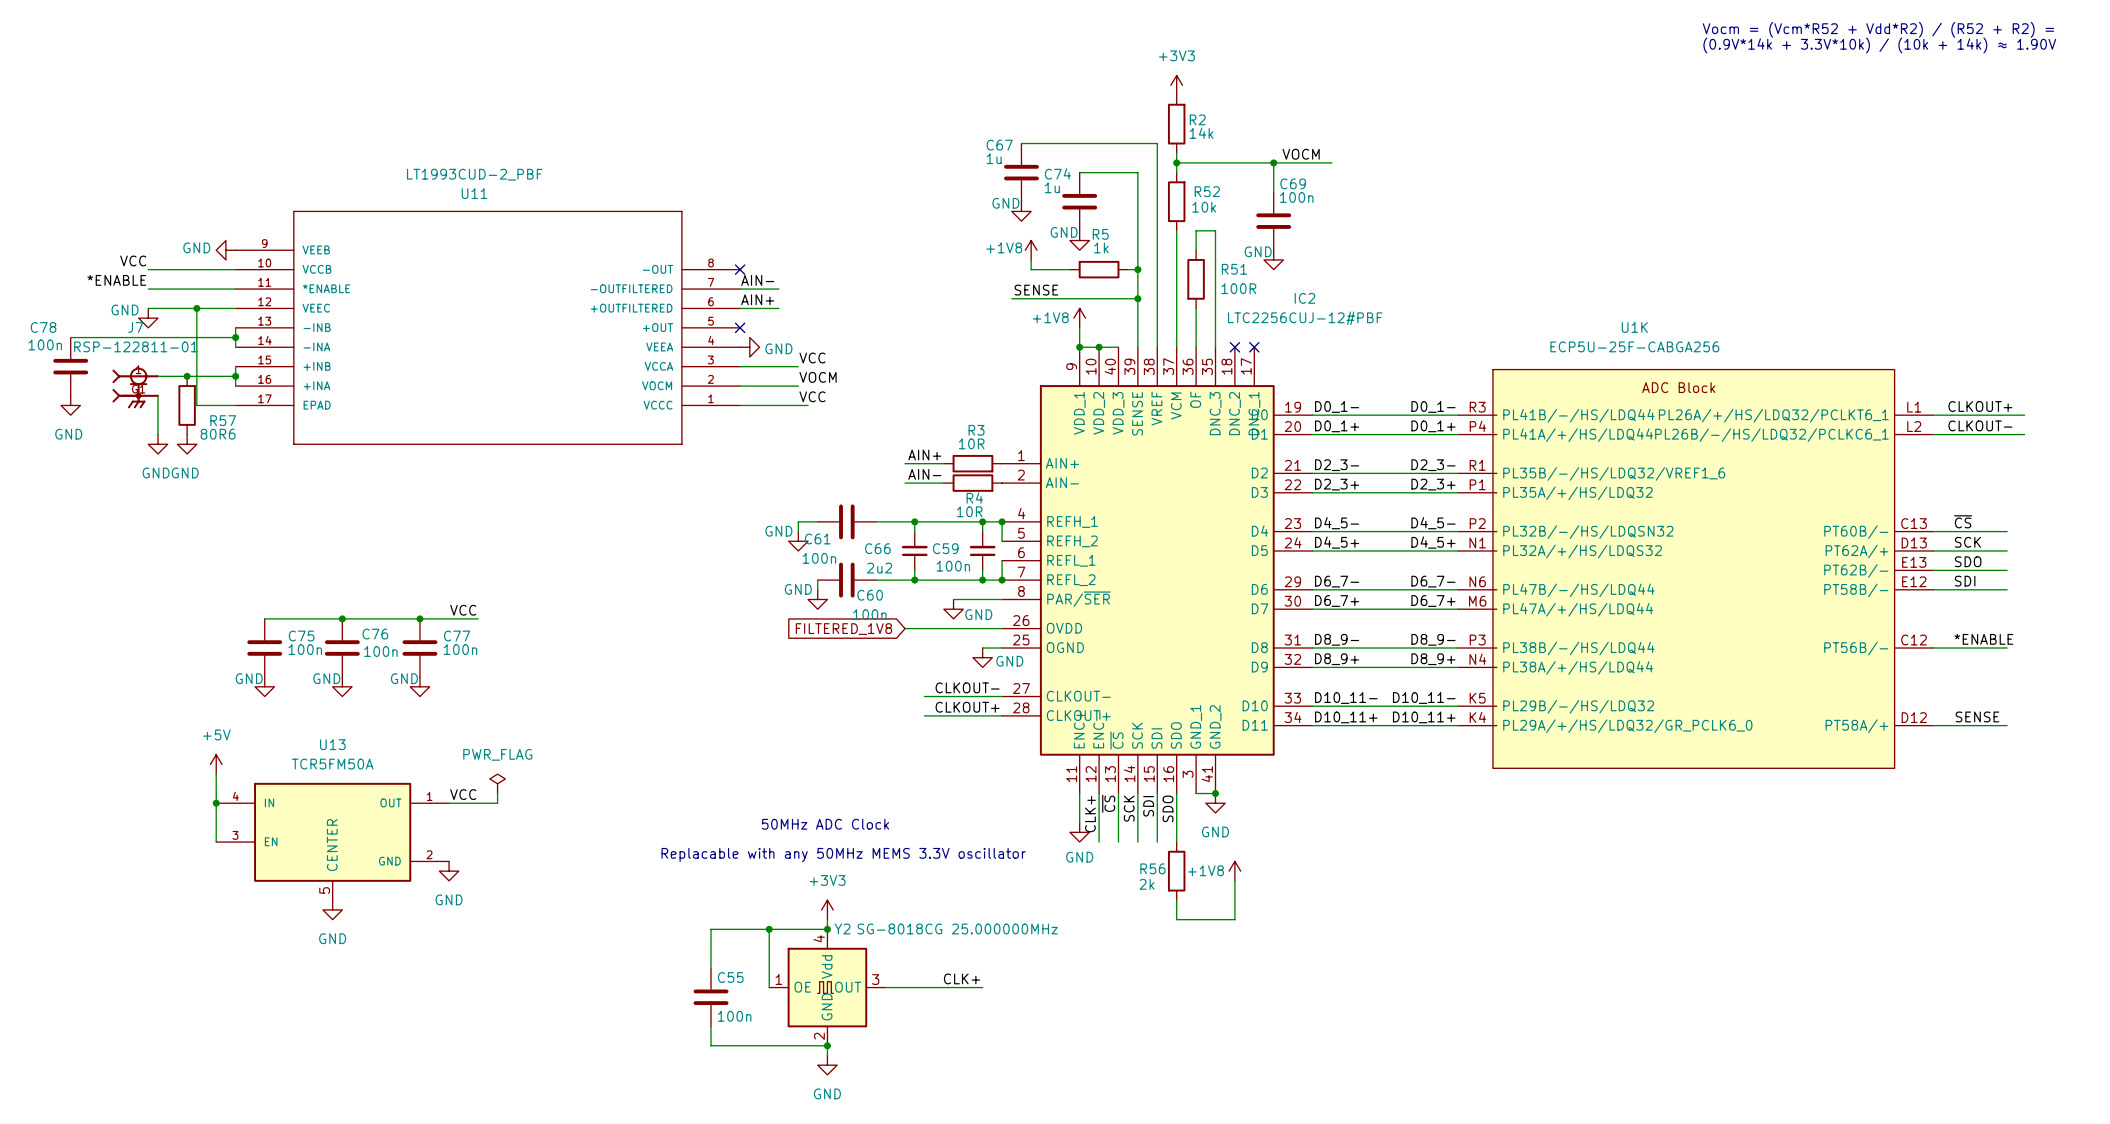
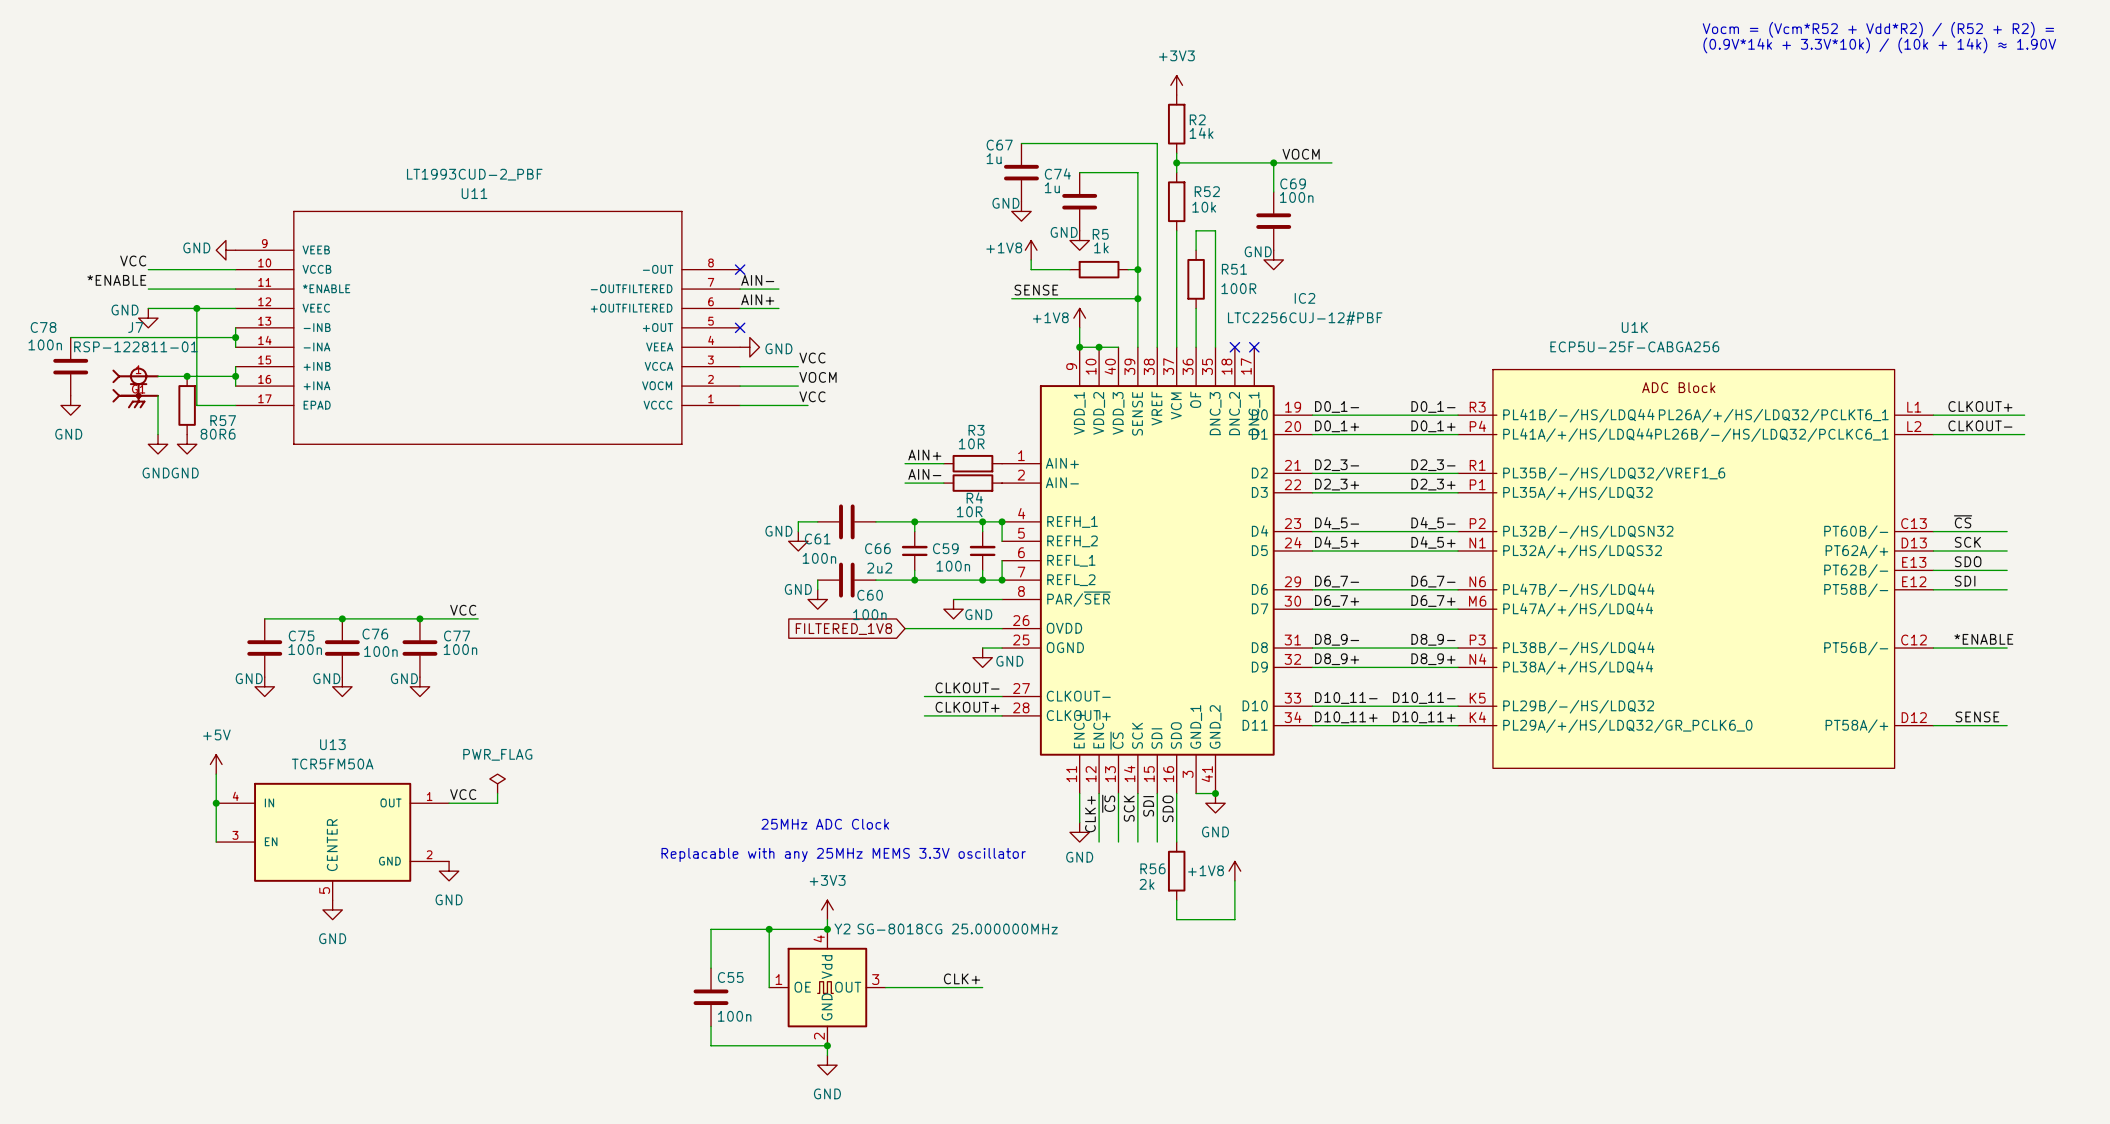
text: 50MHz ADC Clock (825, 824) -> 25MHz ADC Clock (825, 824)
text: Replacable with any 50MHz MEMS 3.3V oscillator (843, 854) -> Replacable with any 25MHz MEMS 3.3V oscillator (843, 854)

